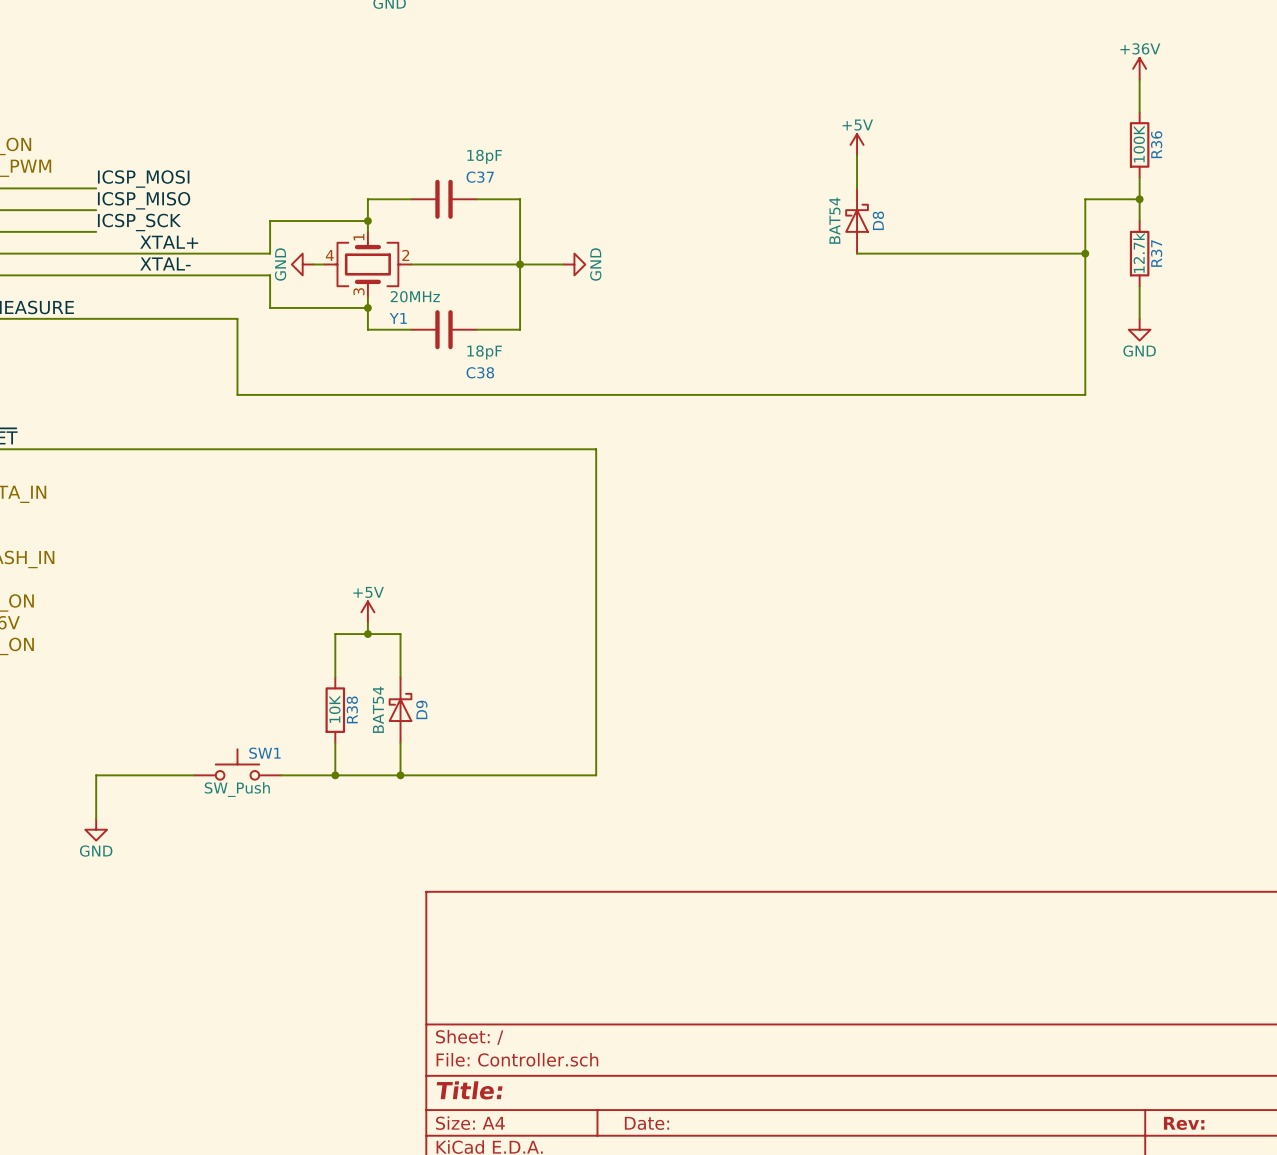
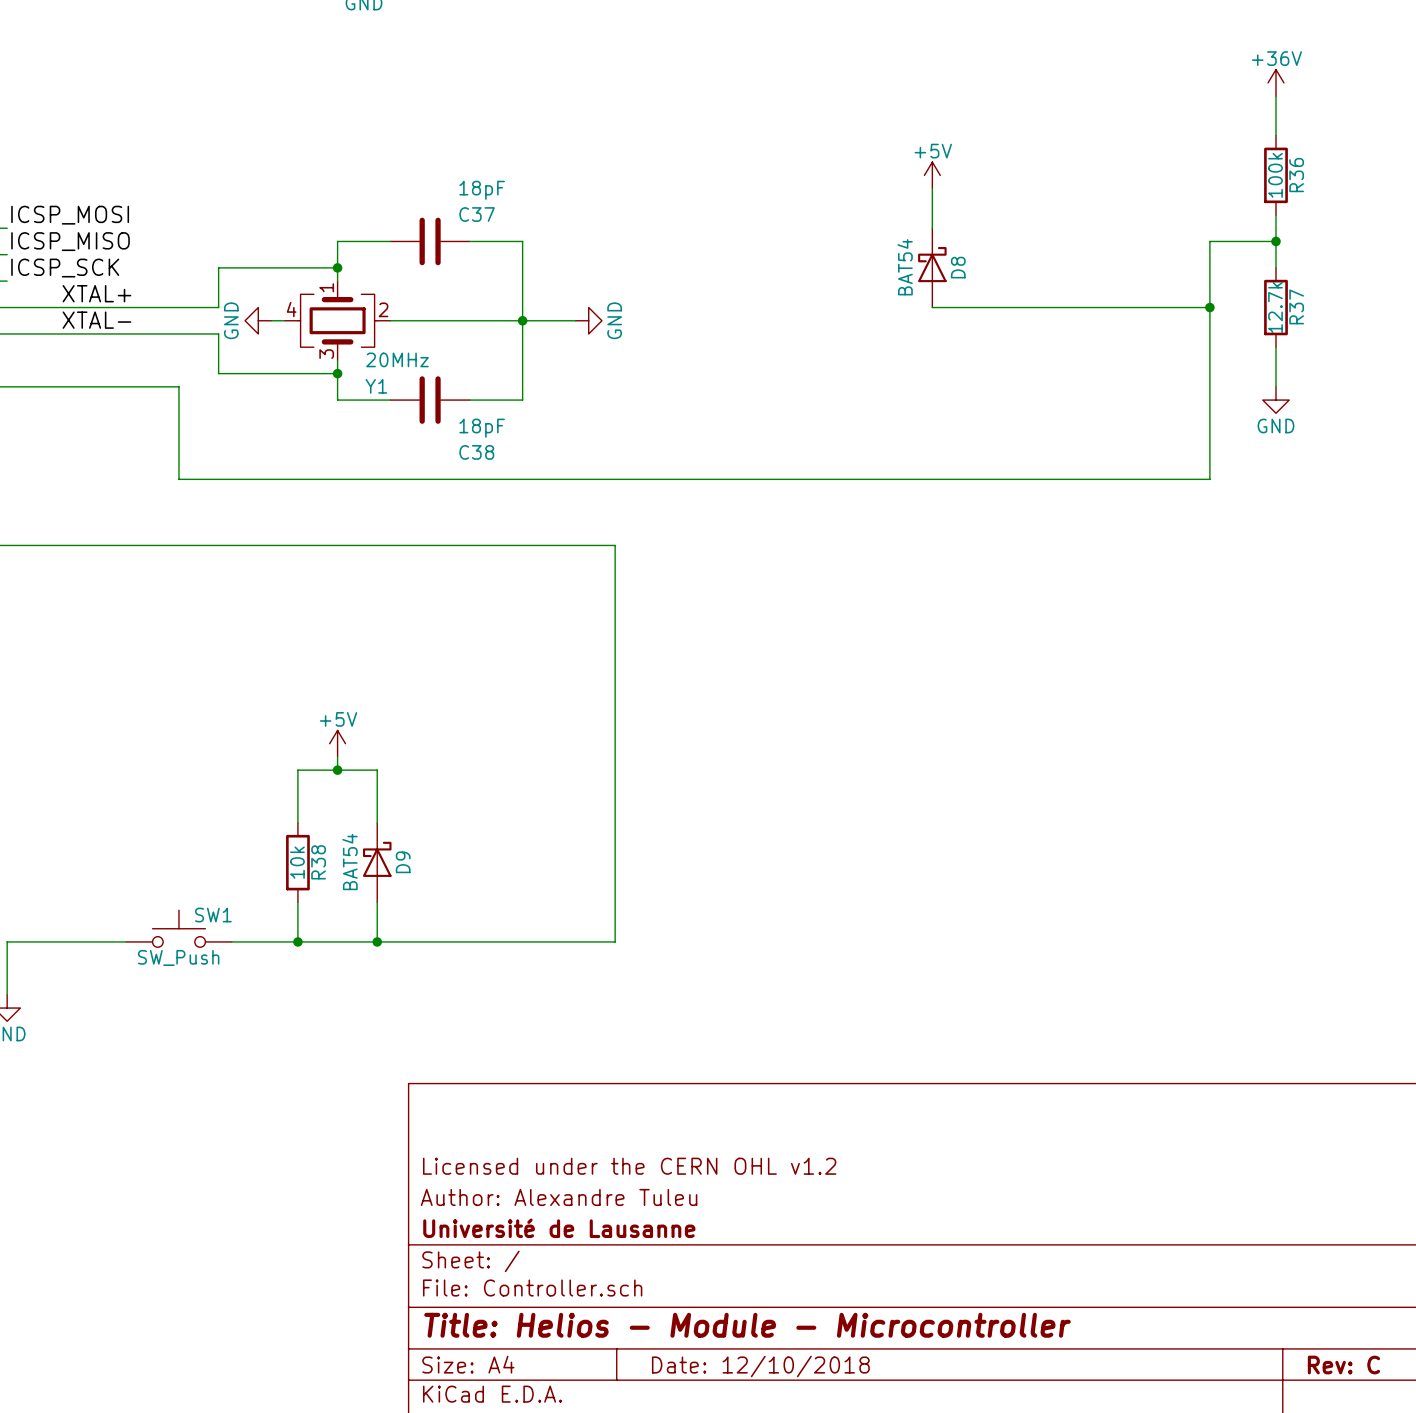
R36 value: 100K (1139, 143) -> 100k (1275, 175)
R38 value: 10K (334, 709) -> 10k (297, 862)
title block: none -> Licensed under the CERN OHL v1.2 (629, 1166)
title block: none -> Author: Alexandre Tuleu (559, 1197)
title block: none -> Université de Lausanne (559, 1228)
title block: Title: (469, 1090) -> Title: Helios - Module - Microcontroller (747, 1325)
title block: Date: (646, 1123) -> Date: 12/10/2018 (760, 1366)
title block: Rev: (1184, 1123) -> Rev: C (1343, 1365)

